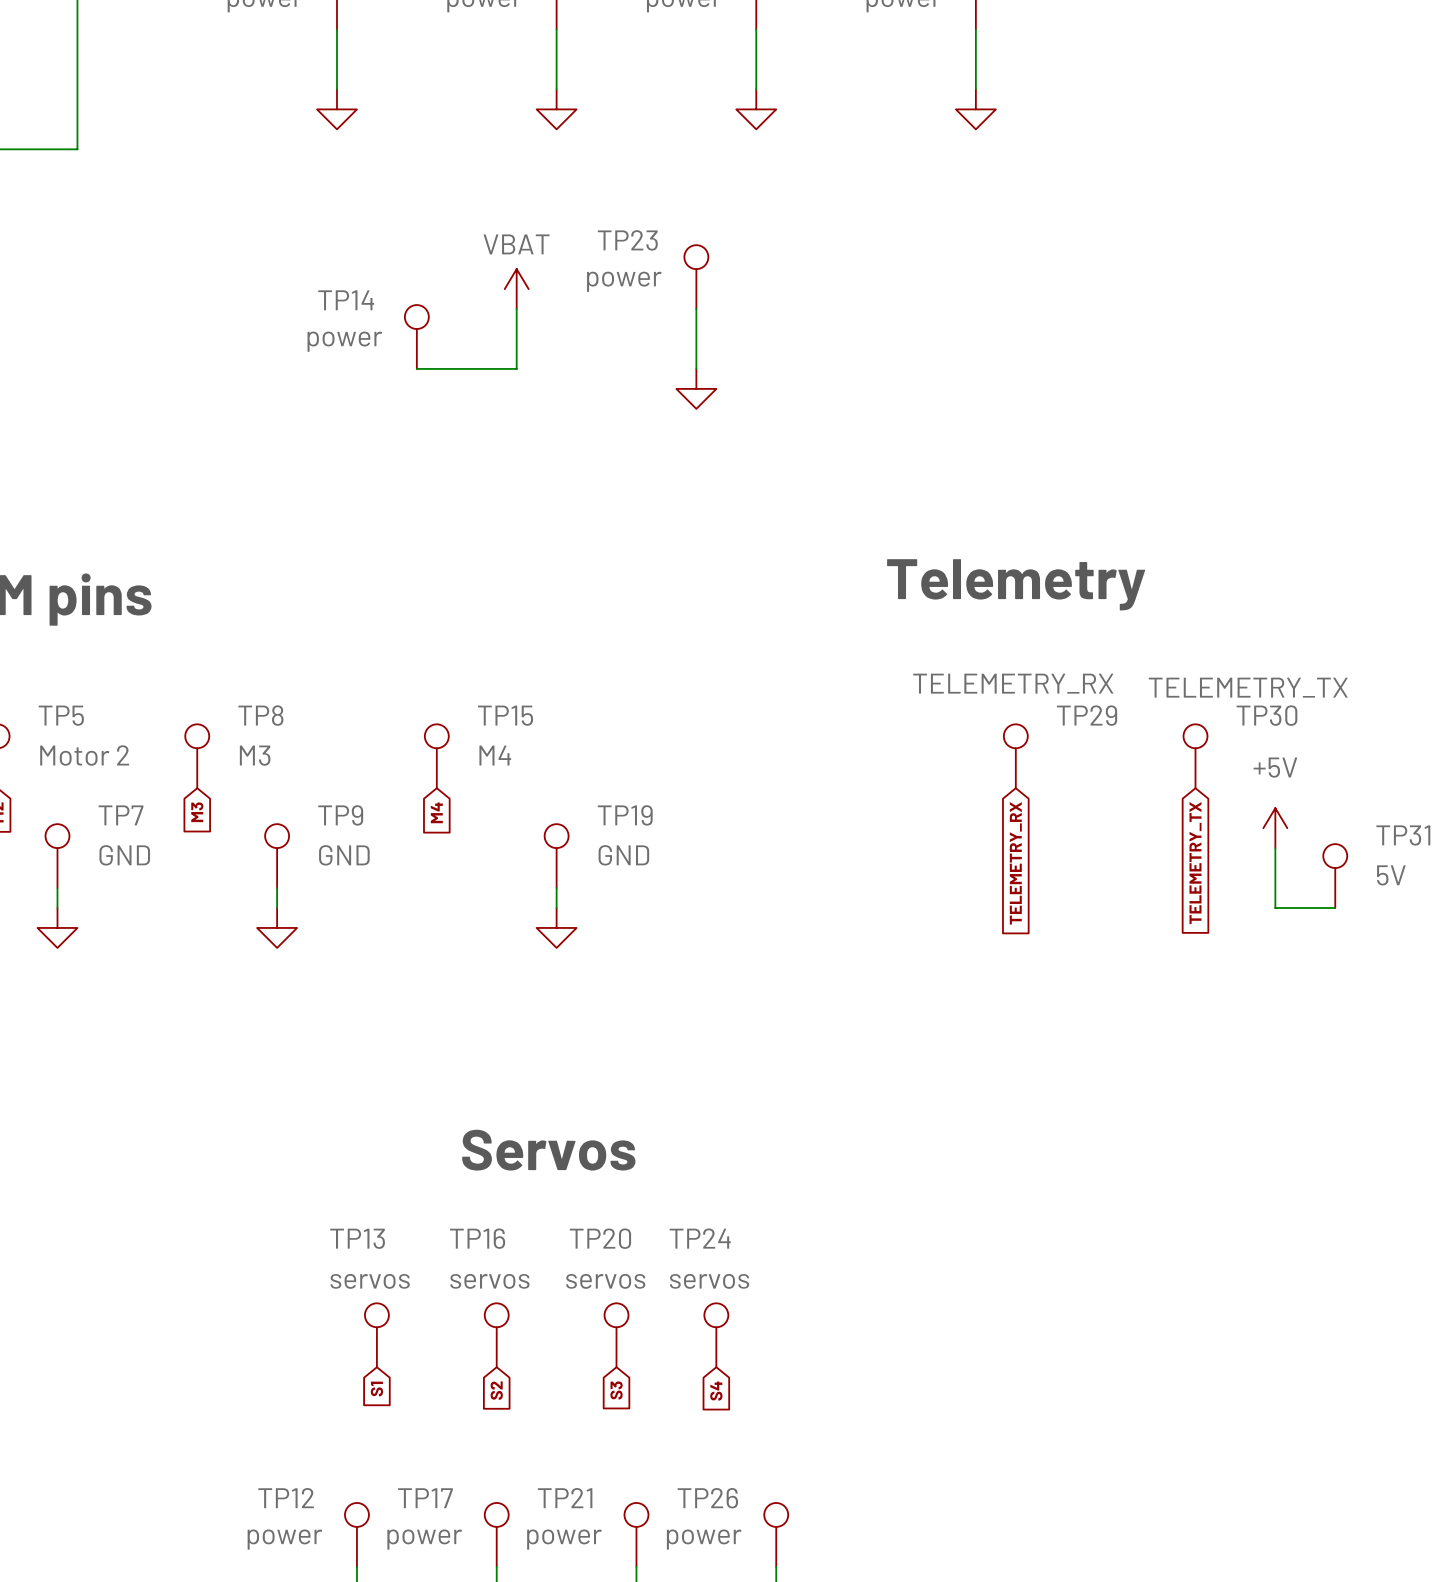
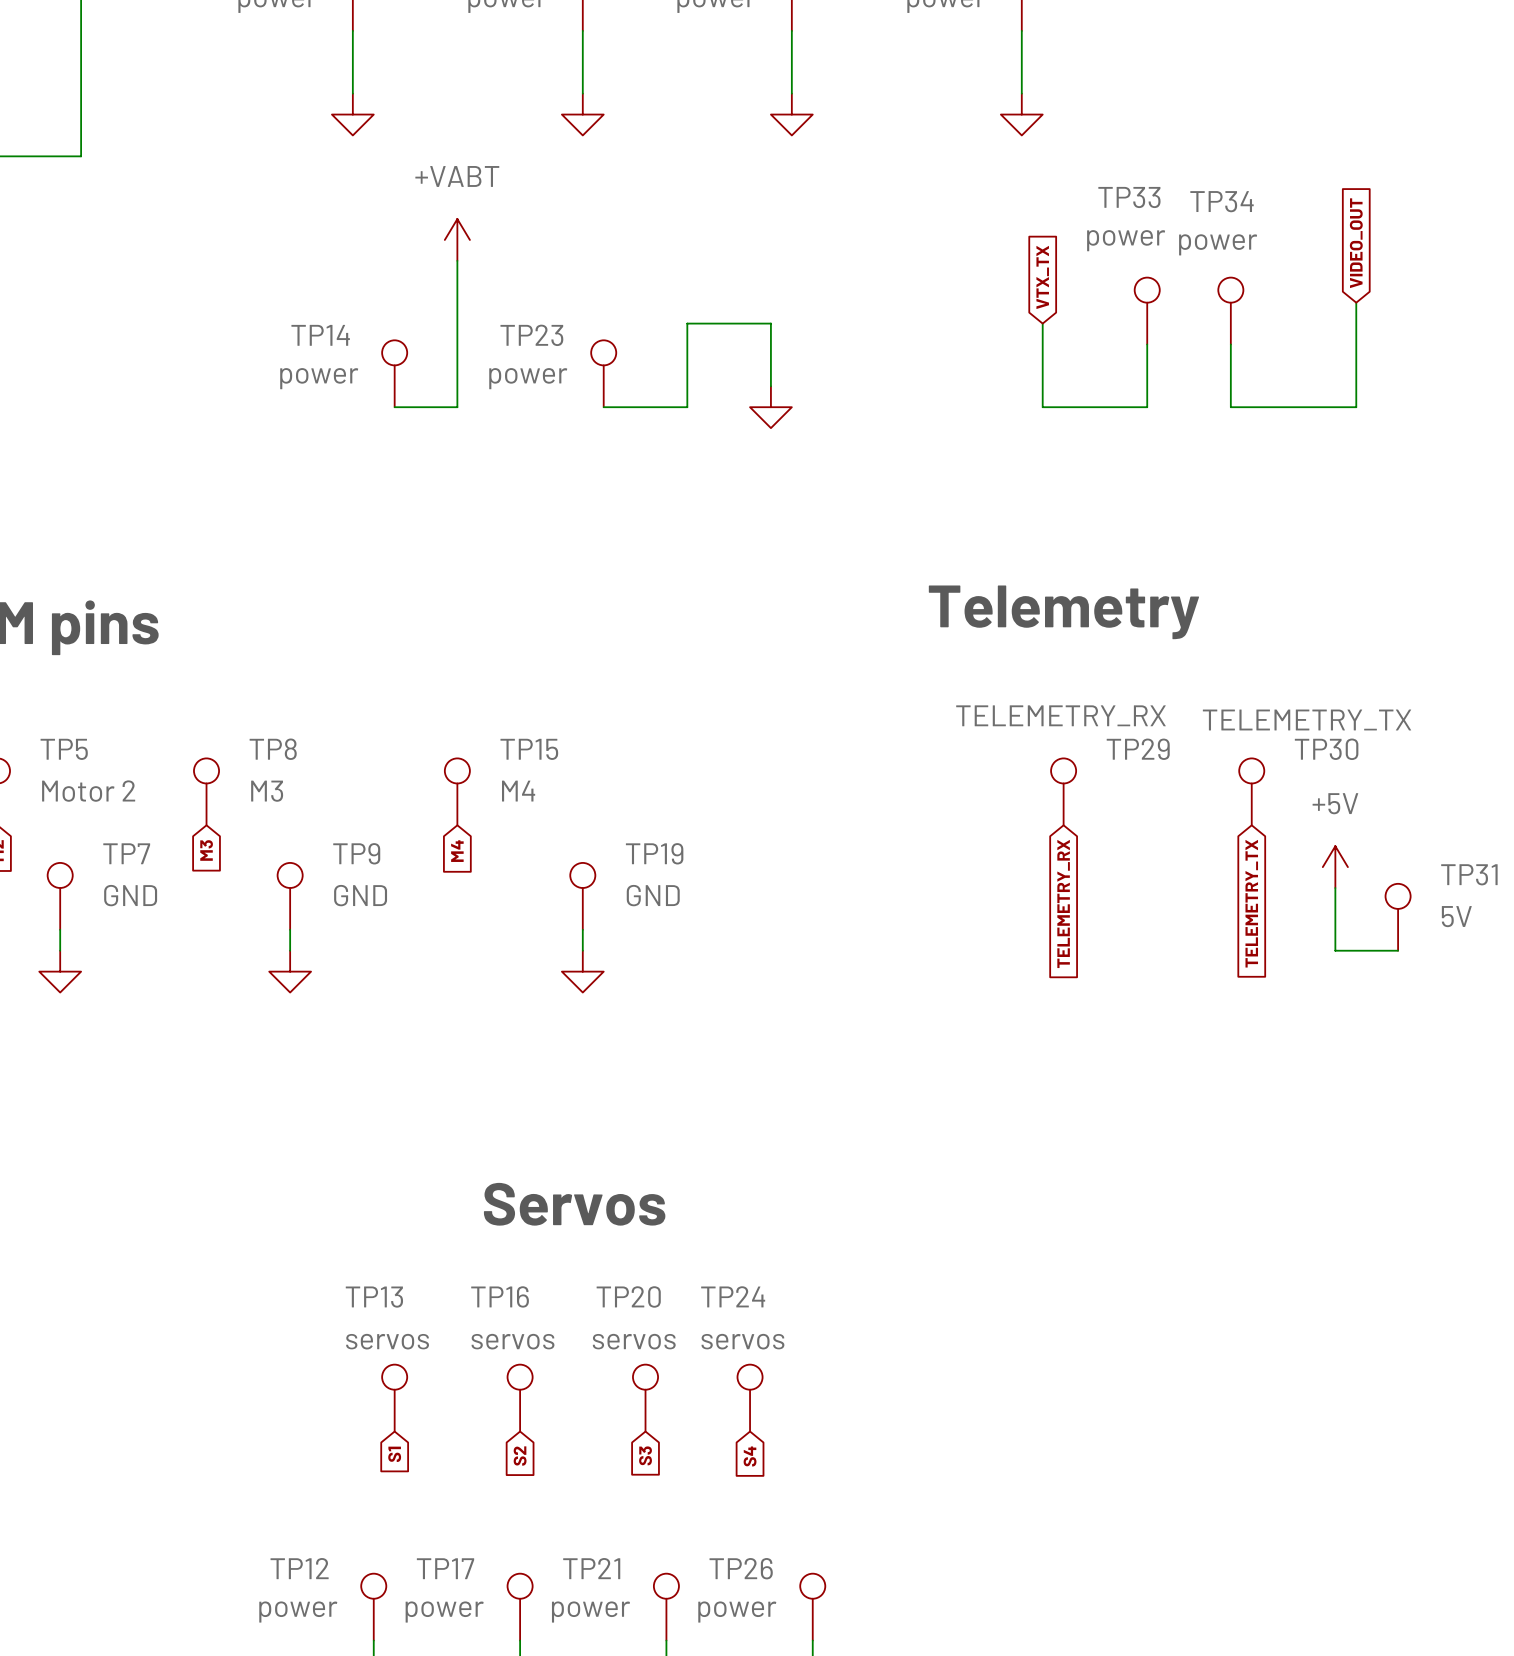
power symbol: none -> +VABT (457, 239)
global label: none -> VIDEO_OUT (1356, 243)
wire: none -> (457, 260) (457, 407) (394, 407)
global label: none -> VTX_TX (1042, 277)
TP23 position: (696, 277) -> (603, 373)
power symbol: VBAT (516, 289) -> none
wire: none -> (1356, 302) (1356, 407) (1230, 407) (1230, 344)
TP33: none -> power (1147, 311)
TP34: none -> power (1230, 311)
wire: (516, 309) (516, 368) (416, 368) -> none
wire: (696, 309) (696, 368) -> none
wire: none -> (1042, 323) (1042, 407) (1147, 407) (1147, 344)
TP14 position: (416, 337) -> (394, 373)
wire: none -> (770, 386) (770, 323) (687, 323) (687, 407) (603, 407)
power symbol position: (696, 388) -> (770, 407)

